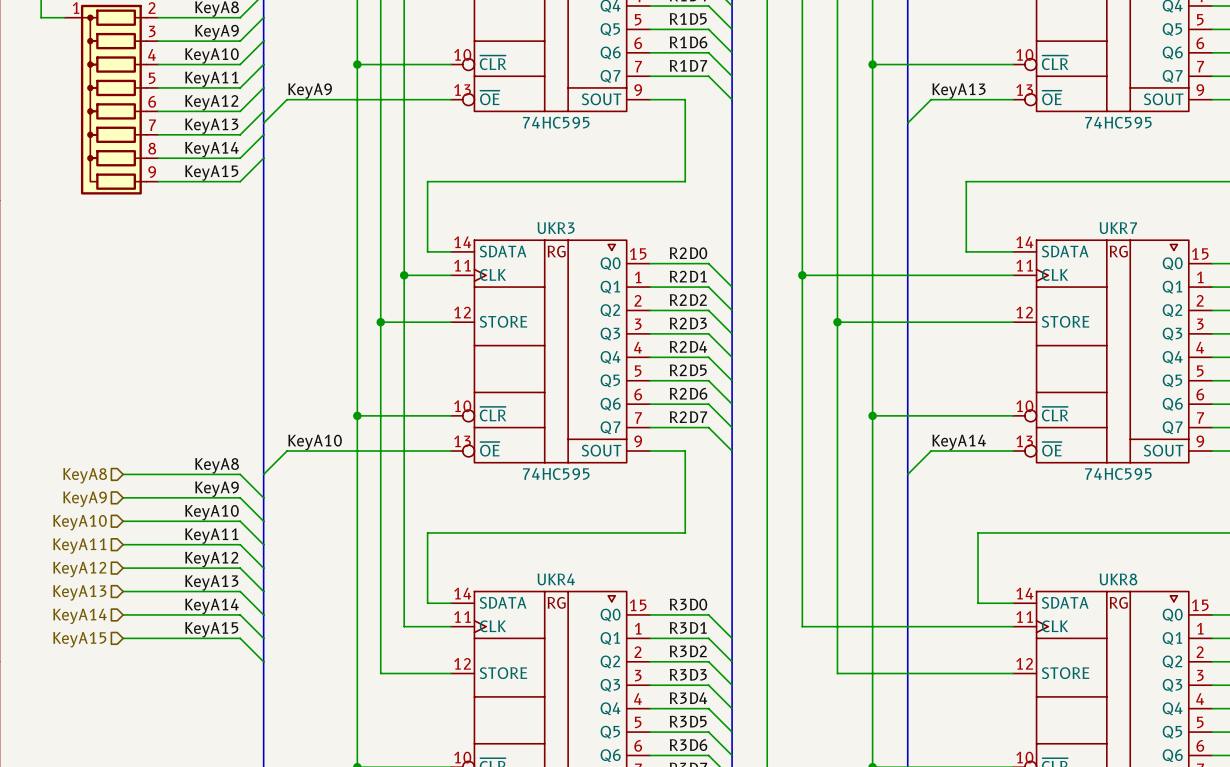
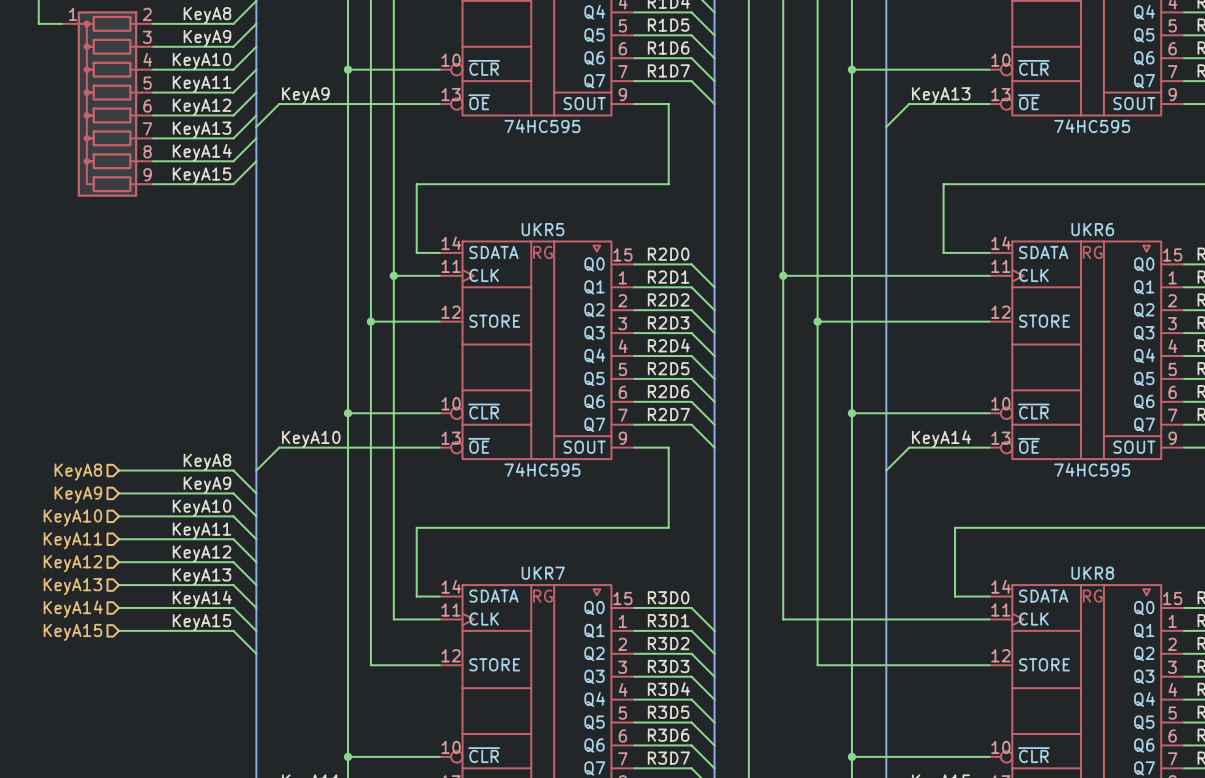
UKR3 name: UKR3 (556, 228) -> UKR5 (542, 229)
UKR7 name: UKR7 (1118, 228) -> UKR6 (1092, 229)
UKR4 name: UKR4 (556, 579) -> UKR7 (543, 573)

